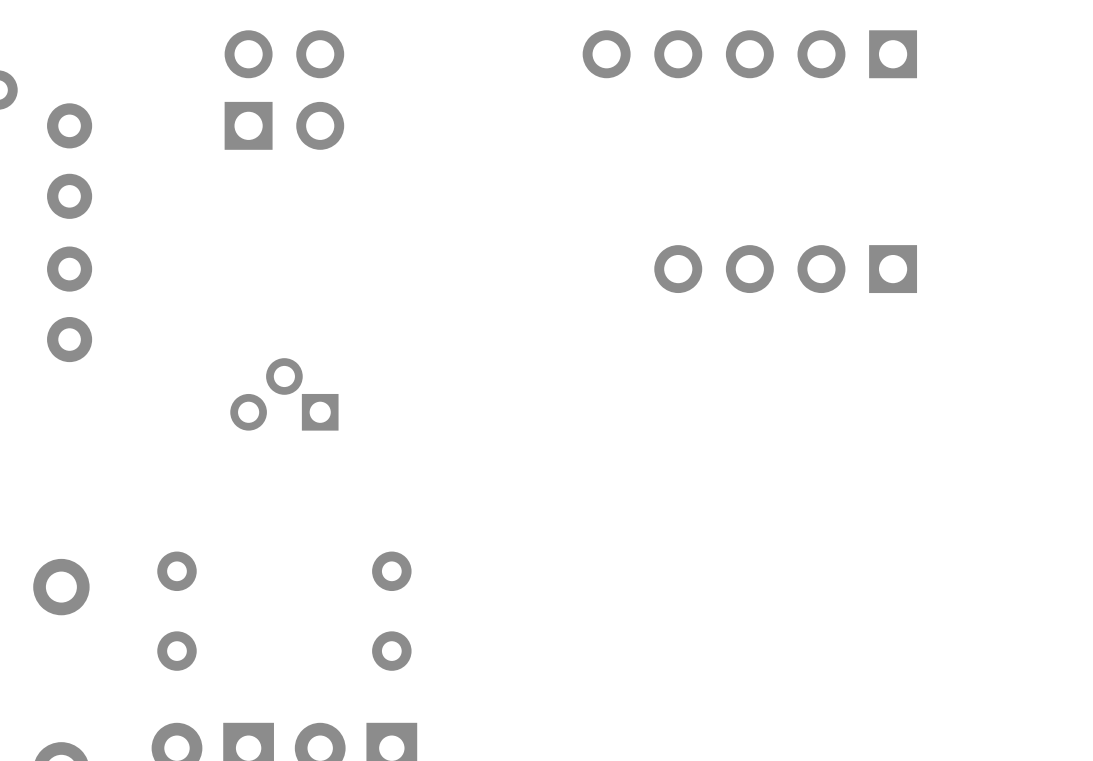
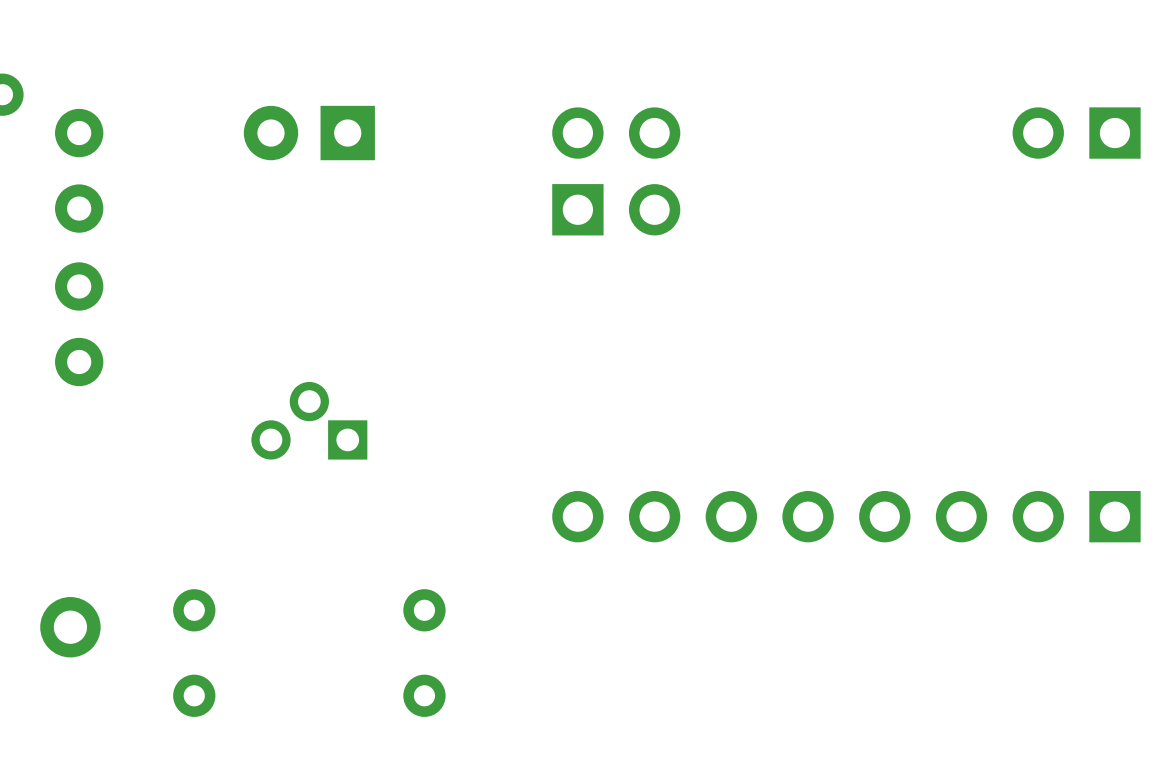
part: (749, 54) -> none
part position: (284, 90) -> (616, 171)
part: none -> (309, 133)
part: none -> (1076, 133)
part: (785, 269) -> none
part: none -> (846, 516)

